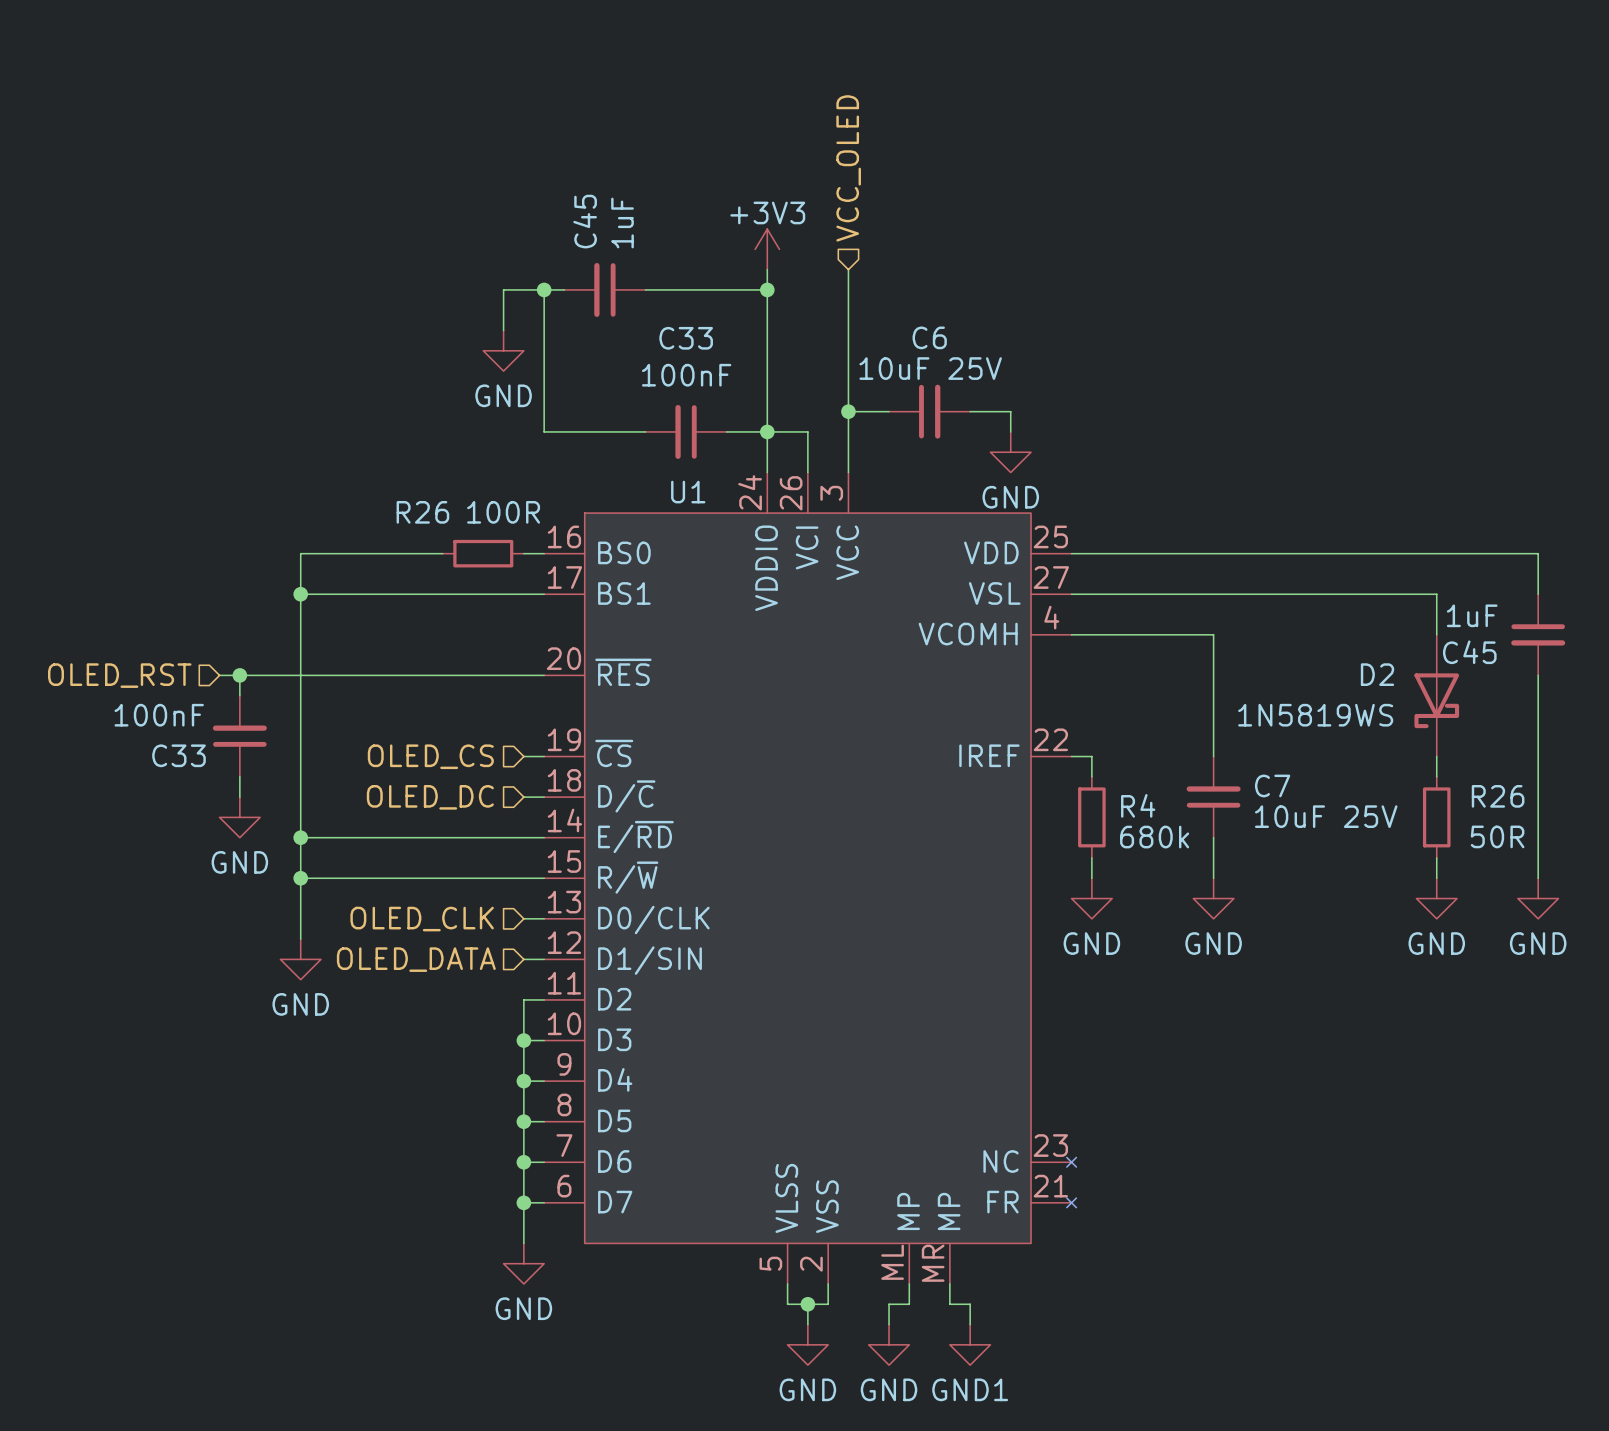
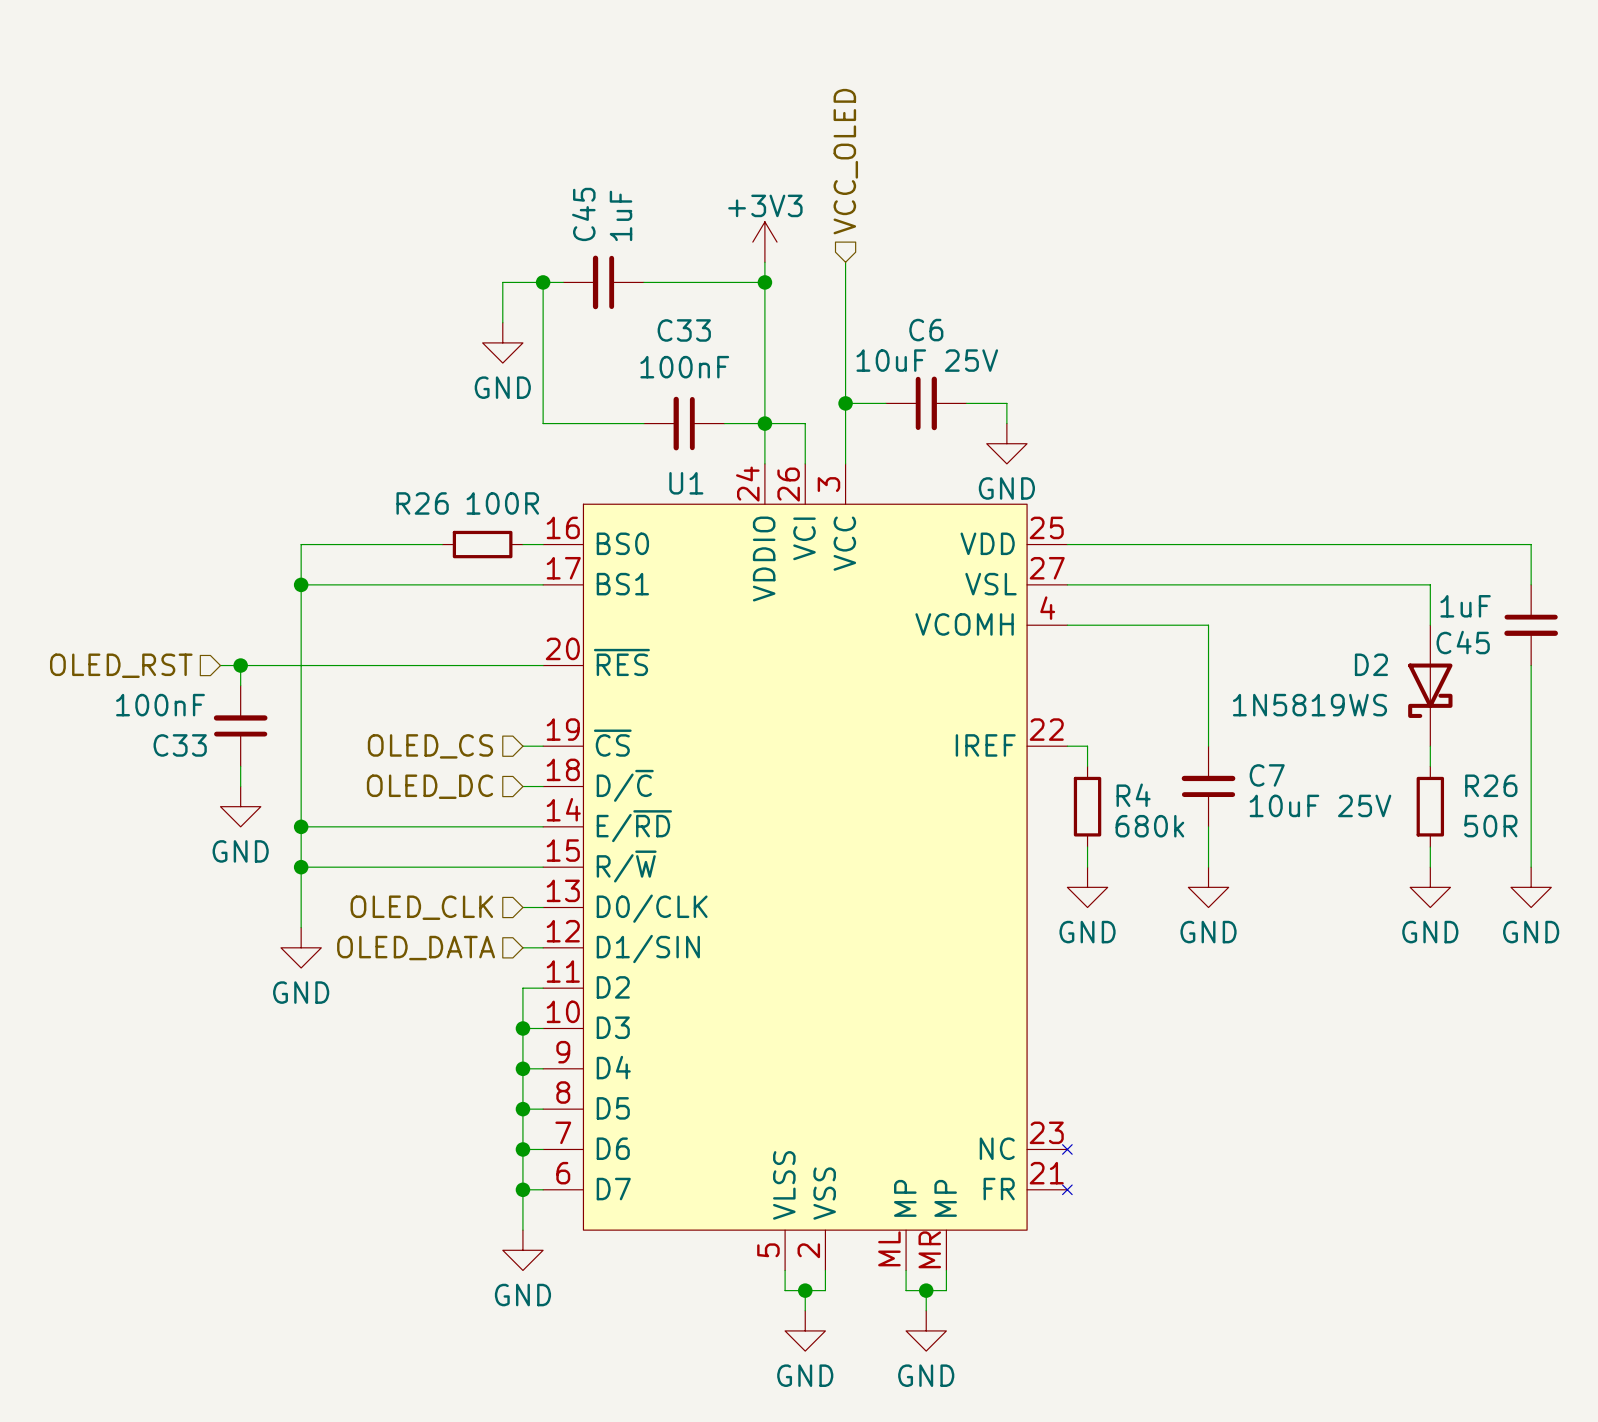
wire: (909, 1304) (889, 1304) (889, 1324) -> (906, 1290) (946, 1290)
wire: none -> (926, 1290) (926, 1310)
junction: none -> (926, 1290)
wire: (949, 1304) (970, 1304) (970, 1324) -> none
power symbol position: GND (889, 1344) -> GND (926, 1330)
power symbol: GND1 (970, 1344) -> none

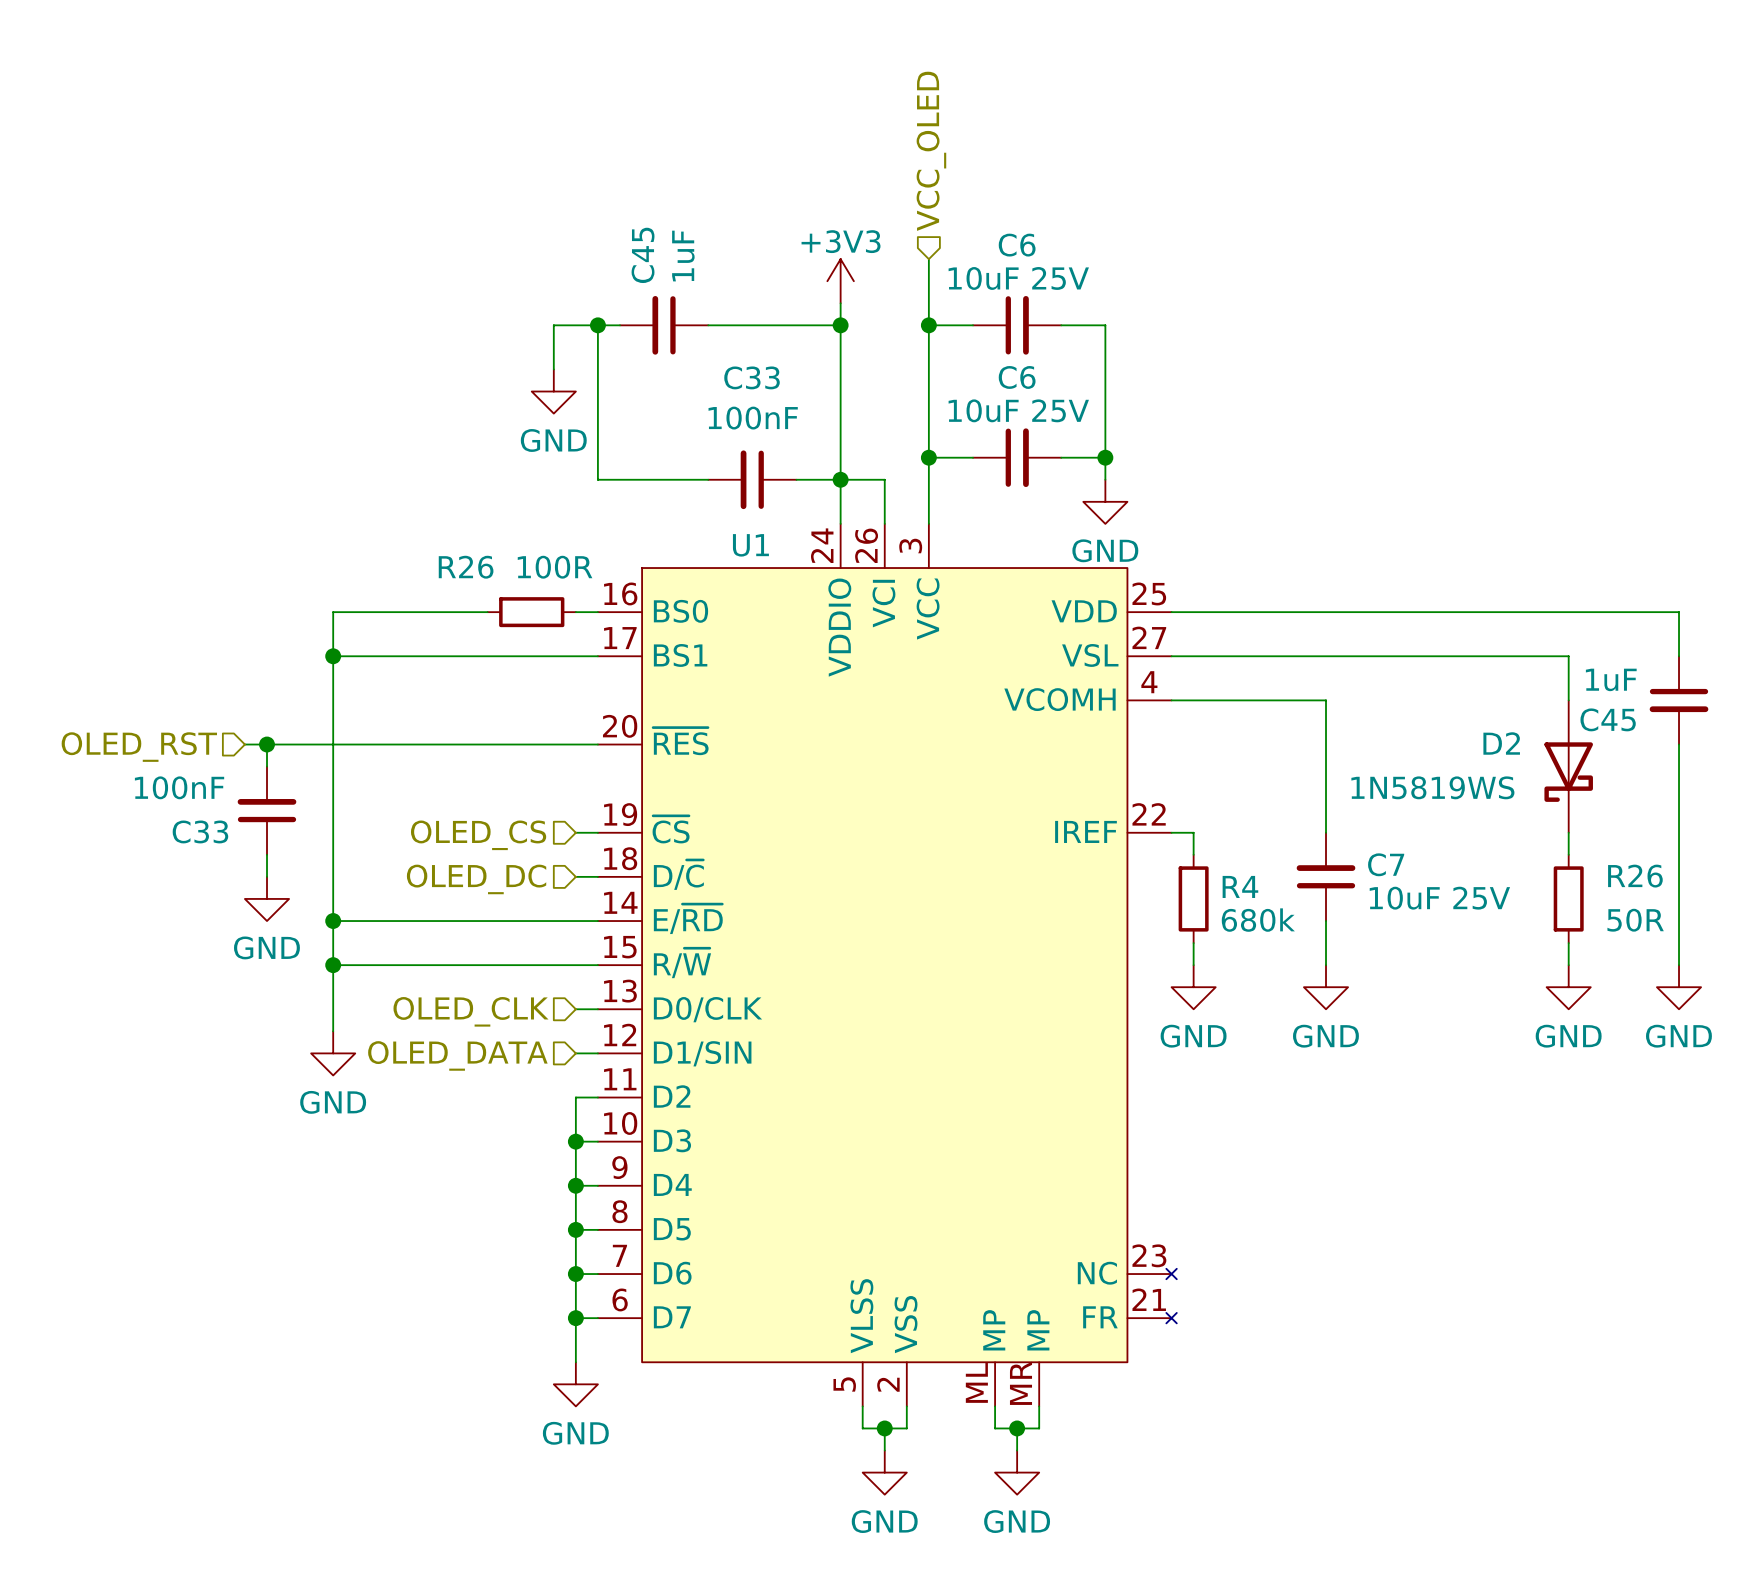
hierarchical label position: VCC_OLED (845, 161) -> VCC_OLED (931, 151)
wire: none -> (928, 259) (928, 303)
wire: none -> (928, 325) (973, 325)
junction: none -> (928, 325)
C6: none -> 10uF 25V (1017, 325)
wire: none -> (1061, 325) (1105, 325) (1105, 457)
junction: none -> (1105, 457)

